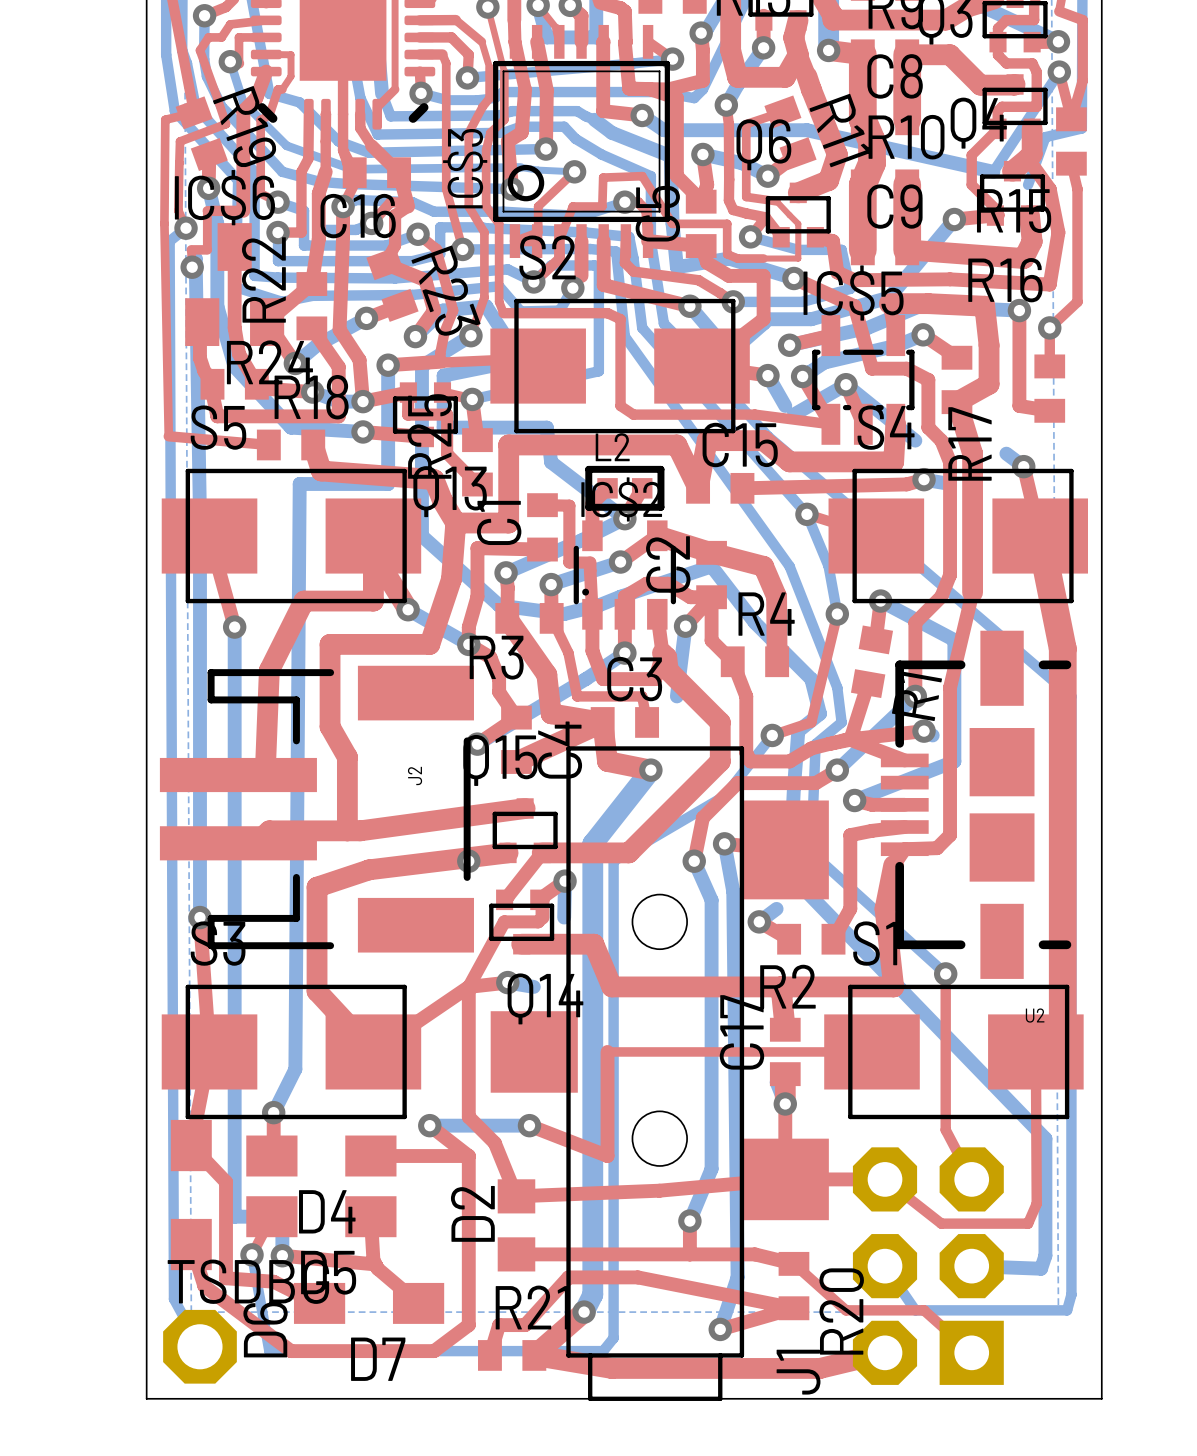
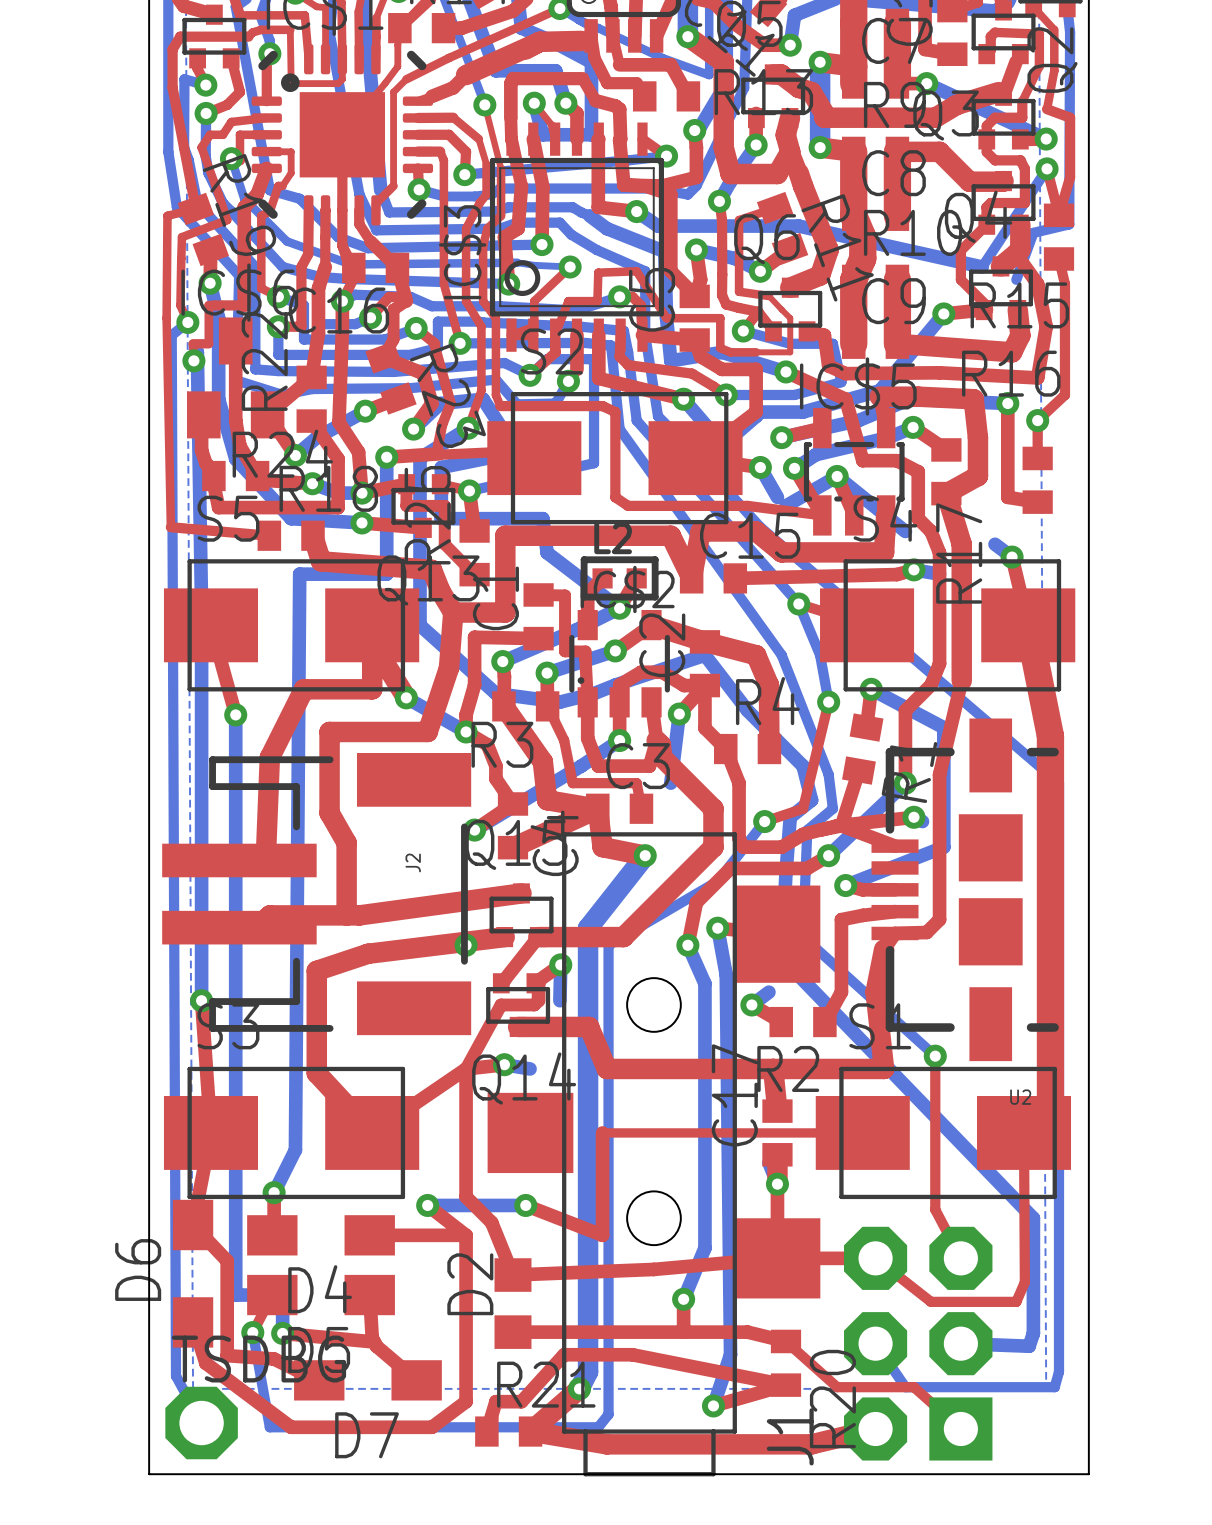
D6 name position: D6 (265, 1329) -> D6 (138, 1270)

